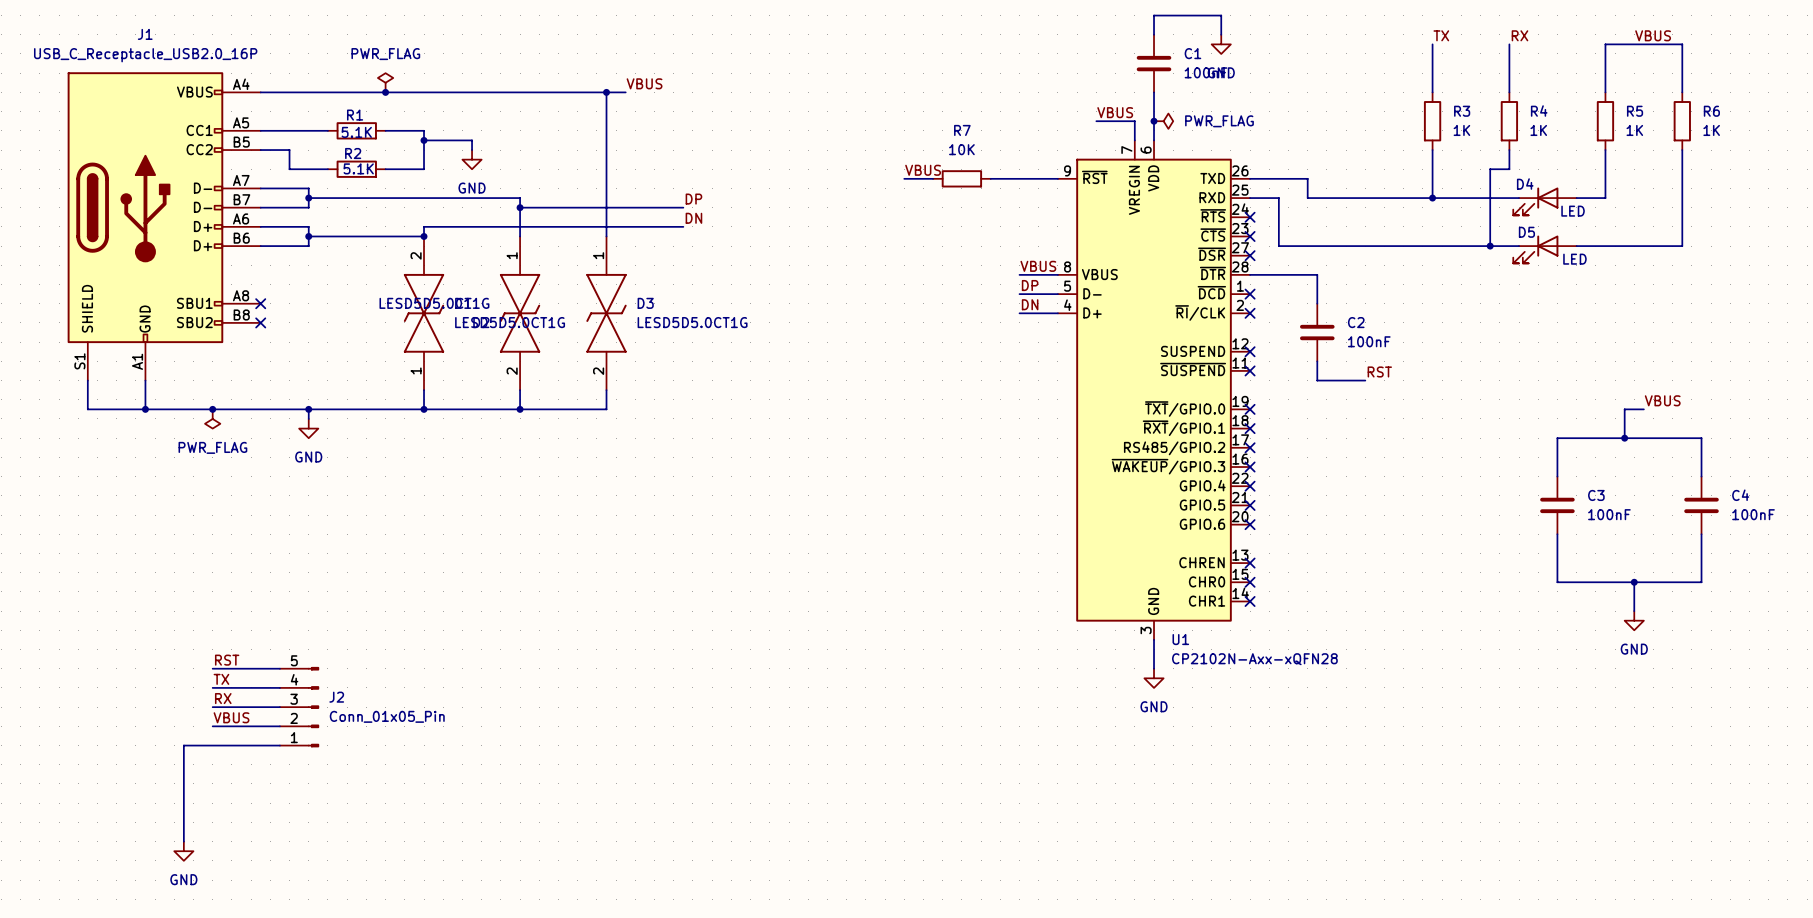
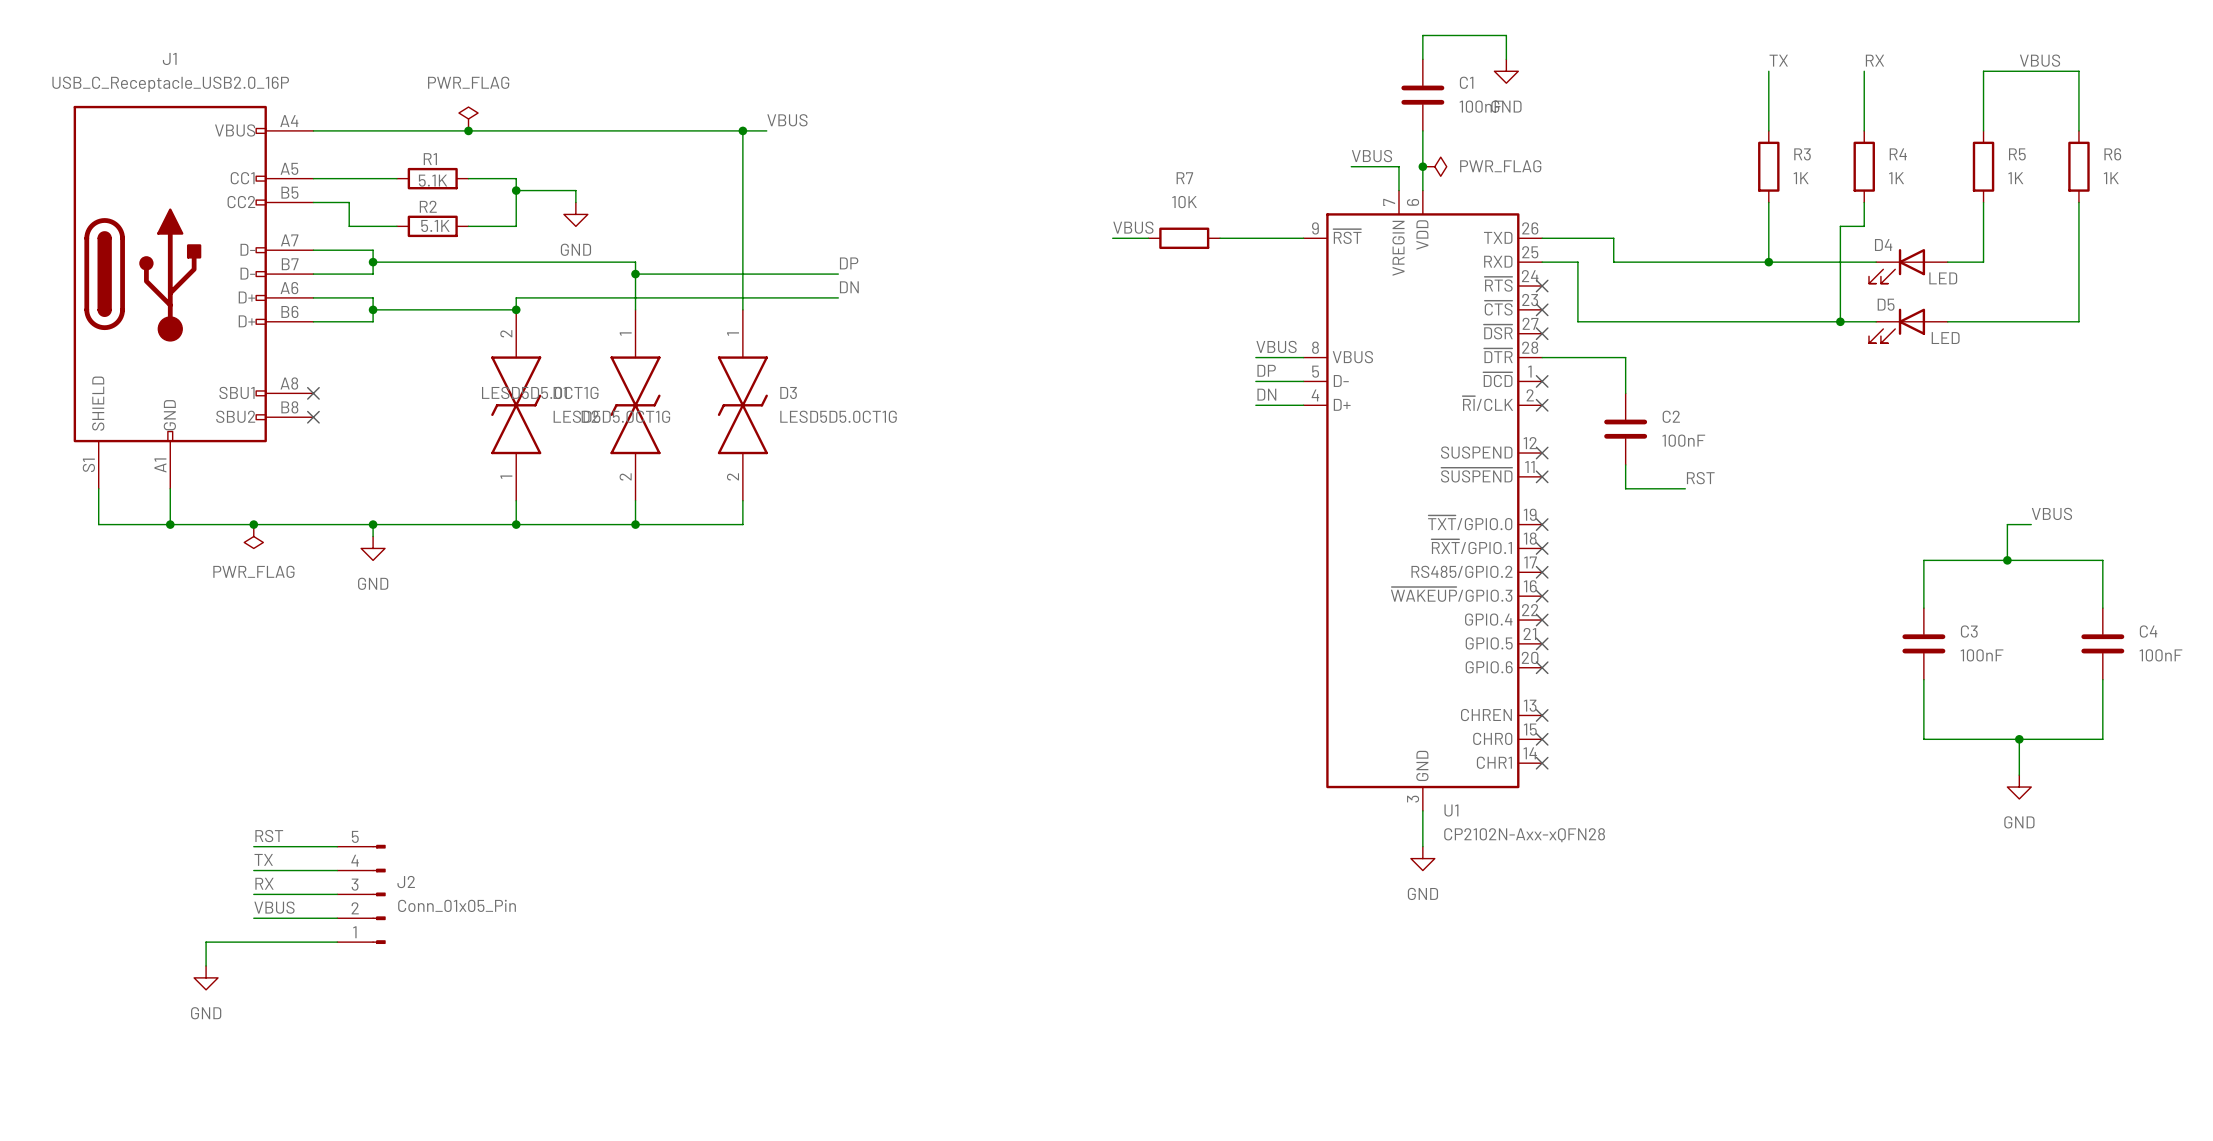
wire: (183, 745) (183, 841) -> (217, 942) (206, 942) (206, 965)
power symbol position: GND (183, 851) -> GND (206, 977)

